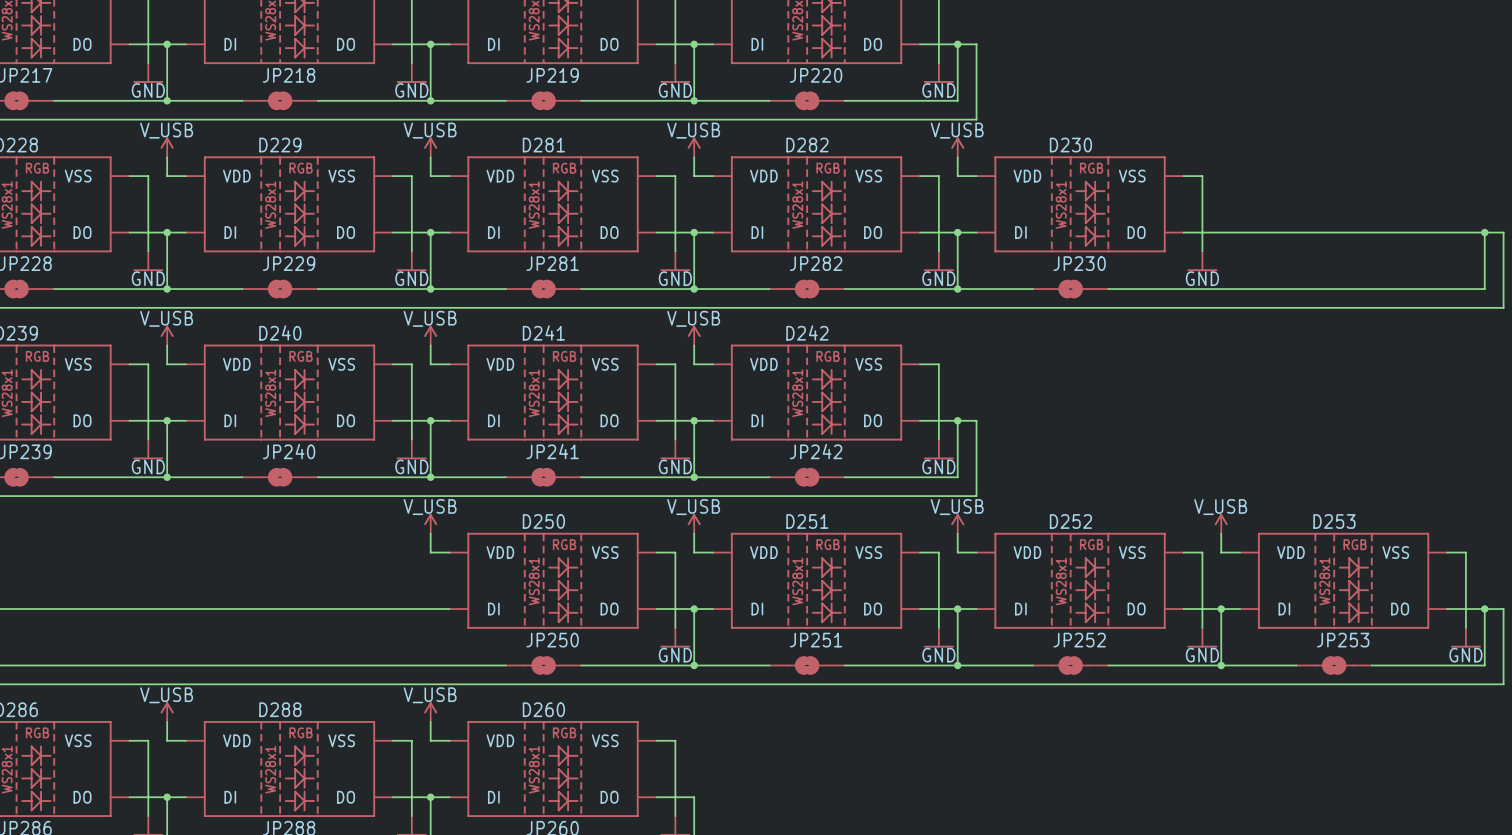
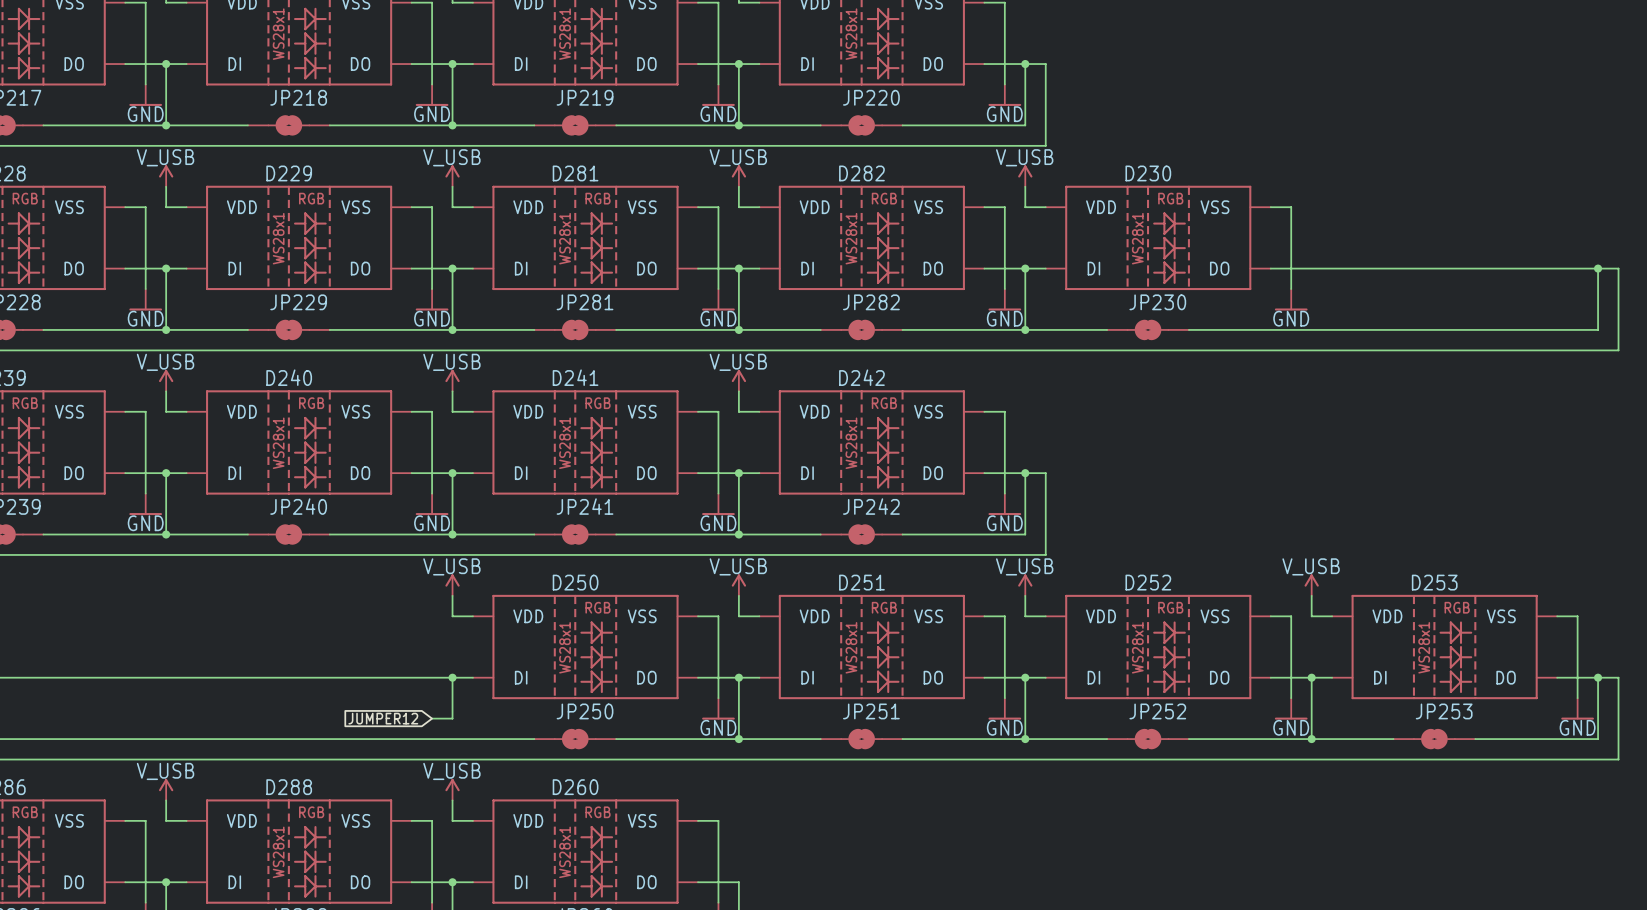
wire: none -> (452, 677) (452, 718) (432, 718)
junction: none -> (452, 677)
global label: none -> JUMPER12 (383, 718)

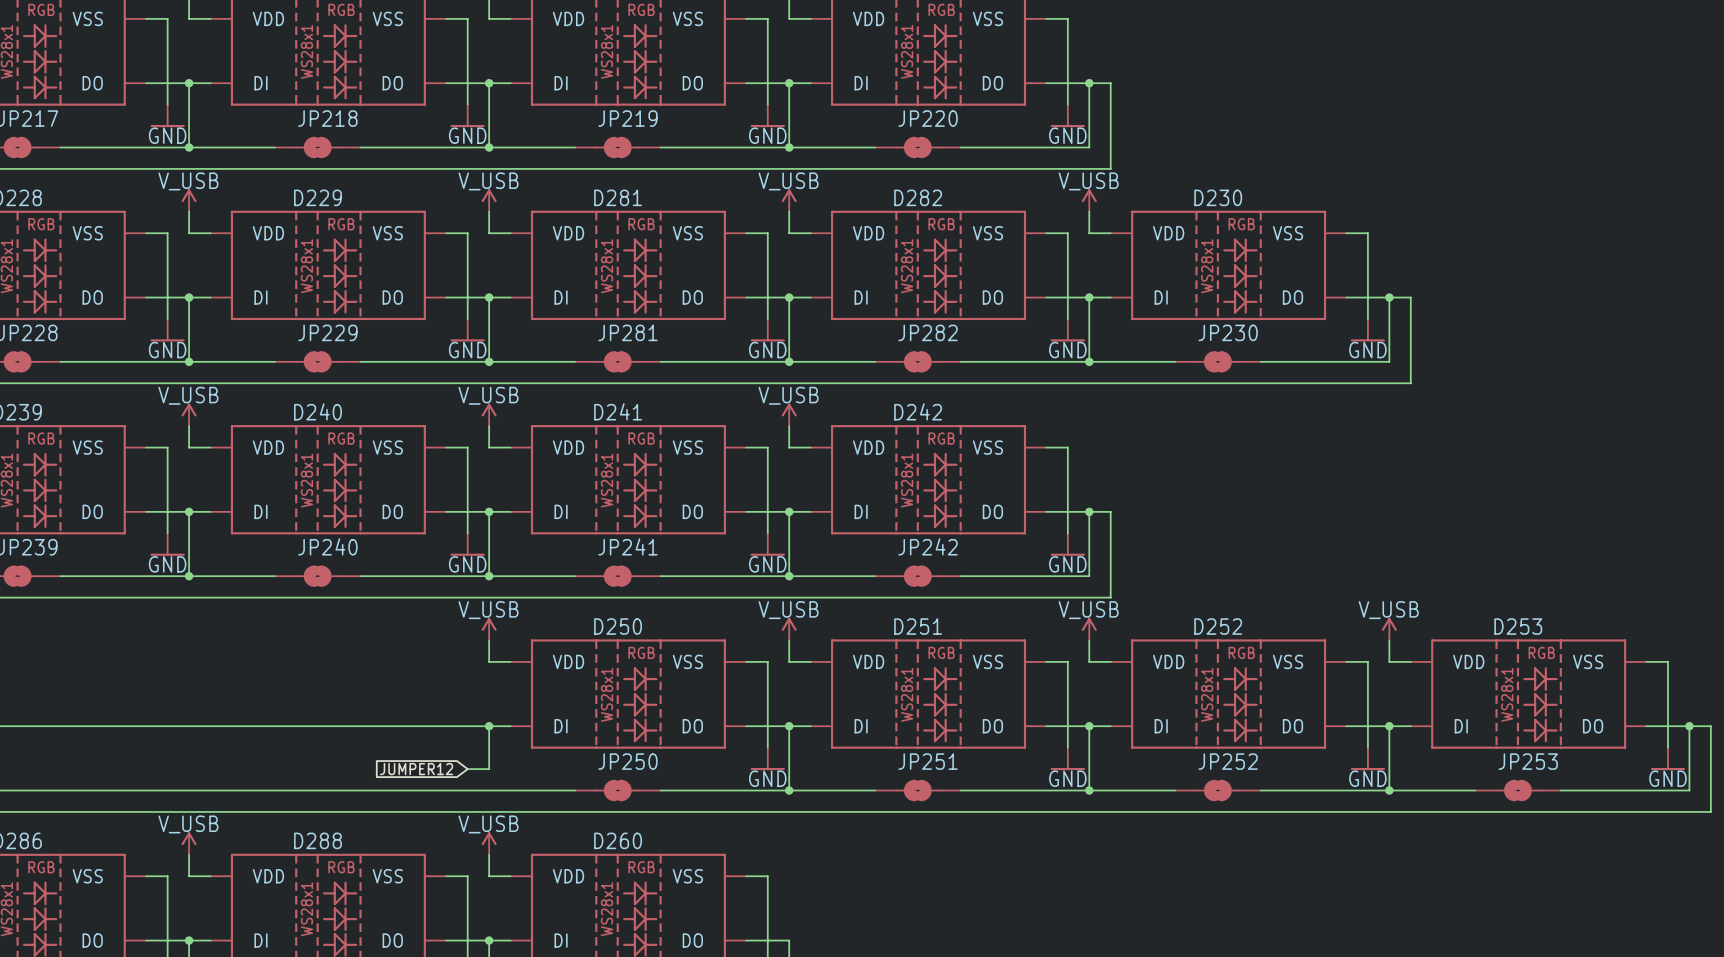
junction: none -> (1389, 297)
wire: (1332, 268) (1618, 268) (1618, 350) (1332, 350) -> (1410, 297) (1410, 383)
wire: (1598, 268) (1598, 329) (1311, 329) -> (1389, 297) (1389, 361)
junction: (1598, 268) -> none

